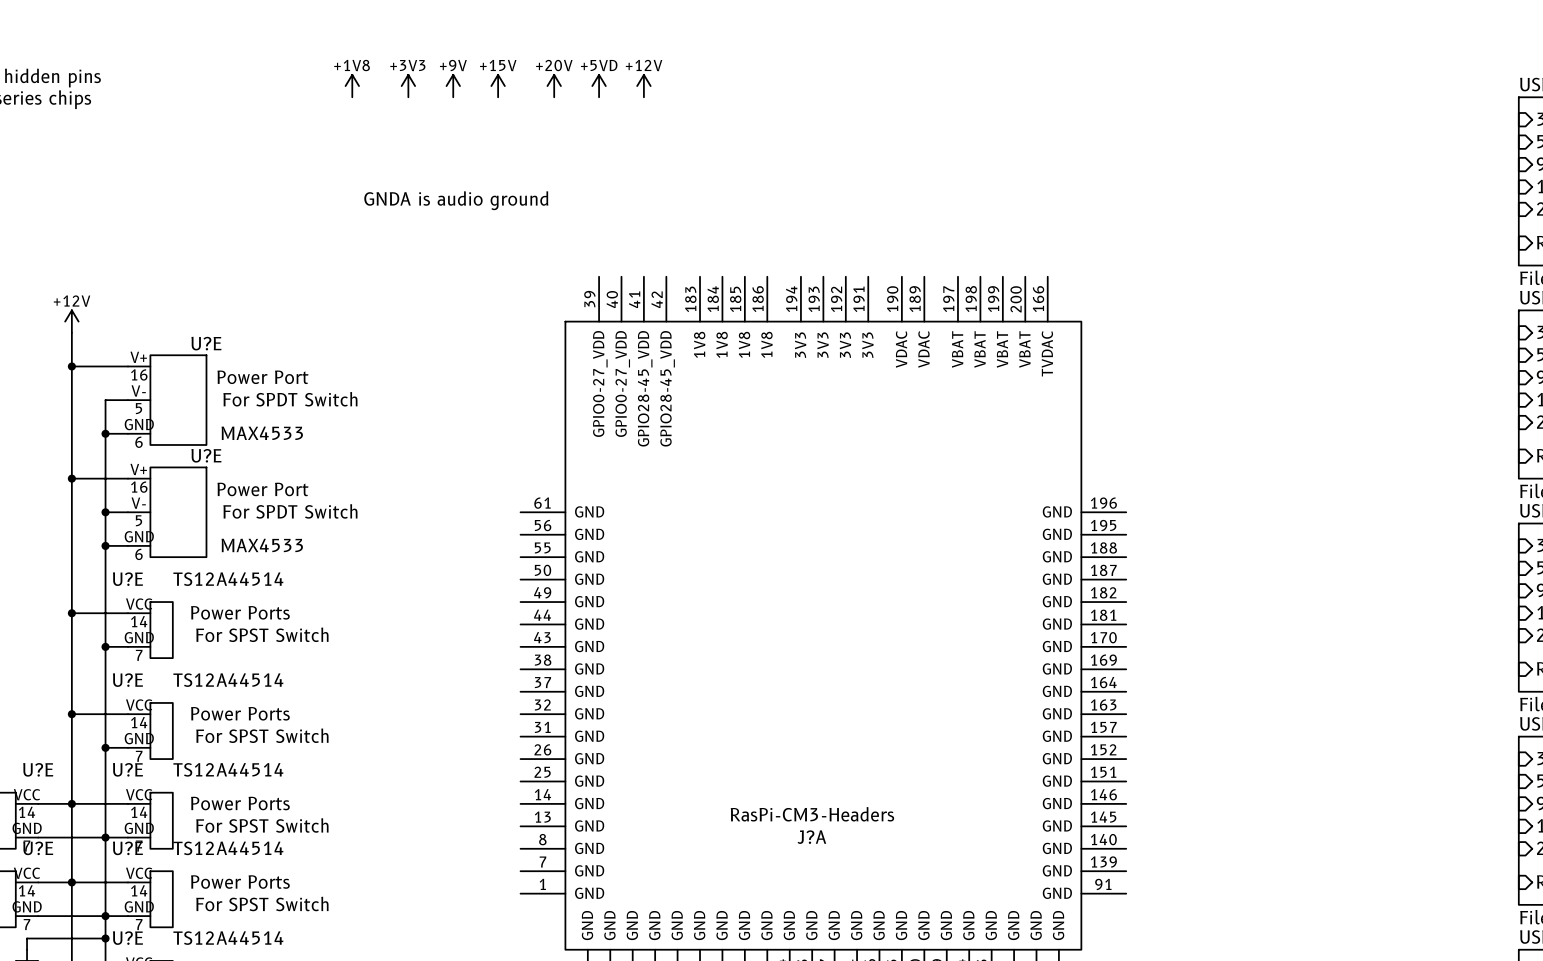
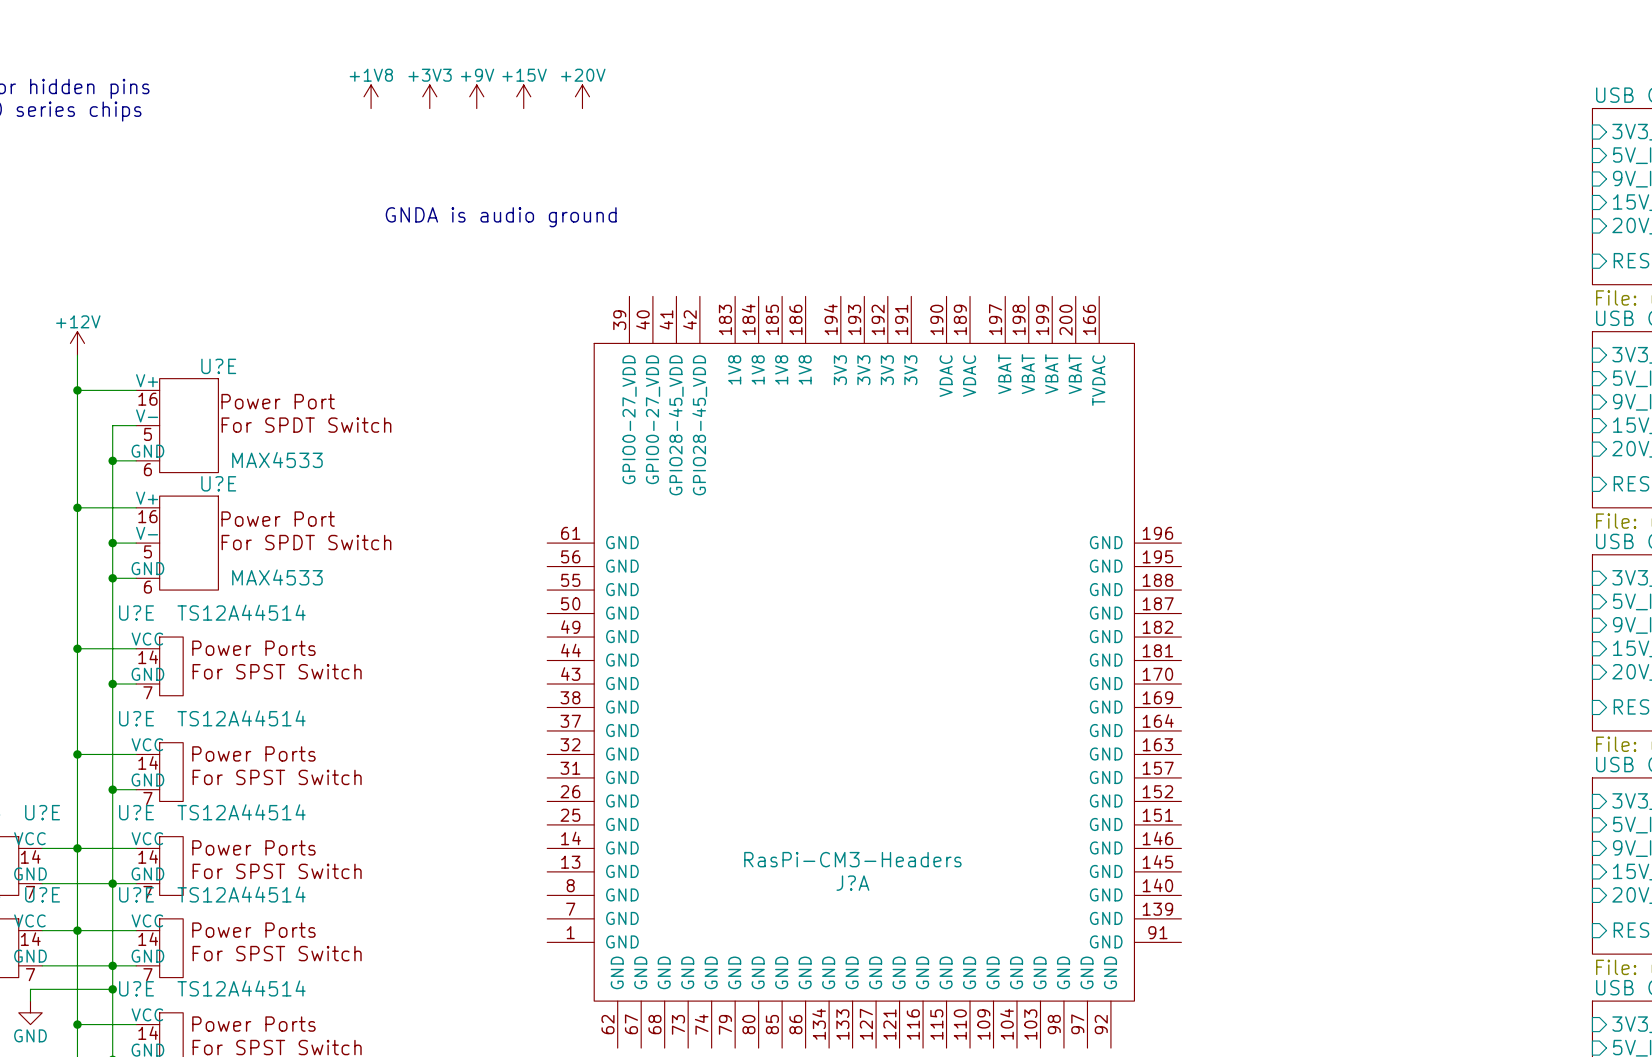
power symbol: +5VD (599, 86) -> none
power symbol: +12V (643, 86) -> none

